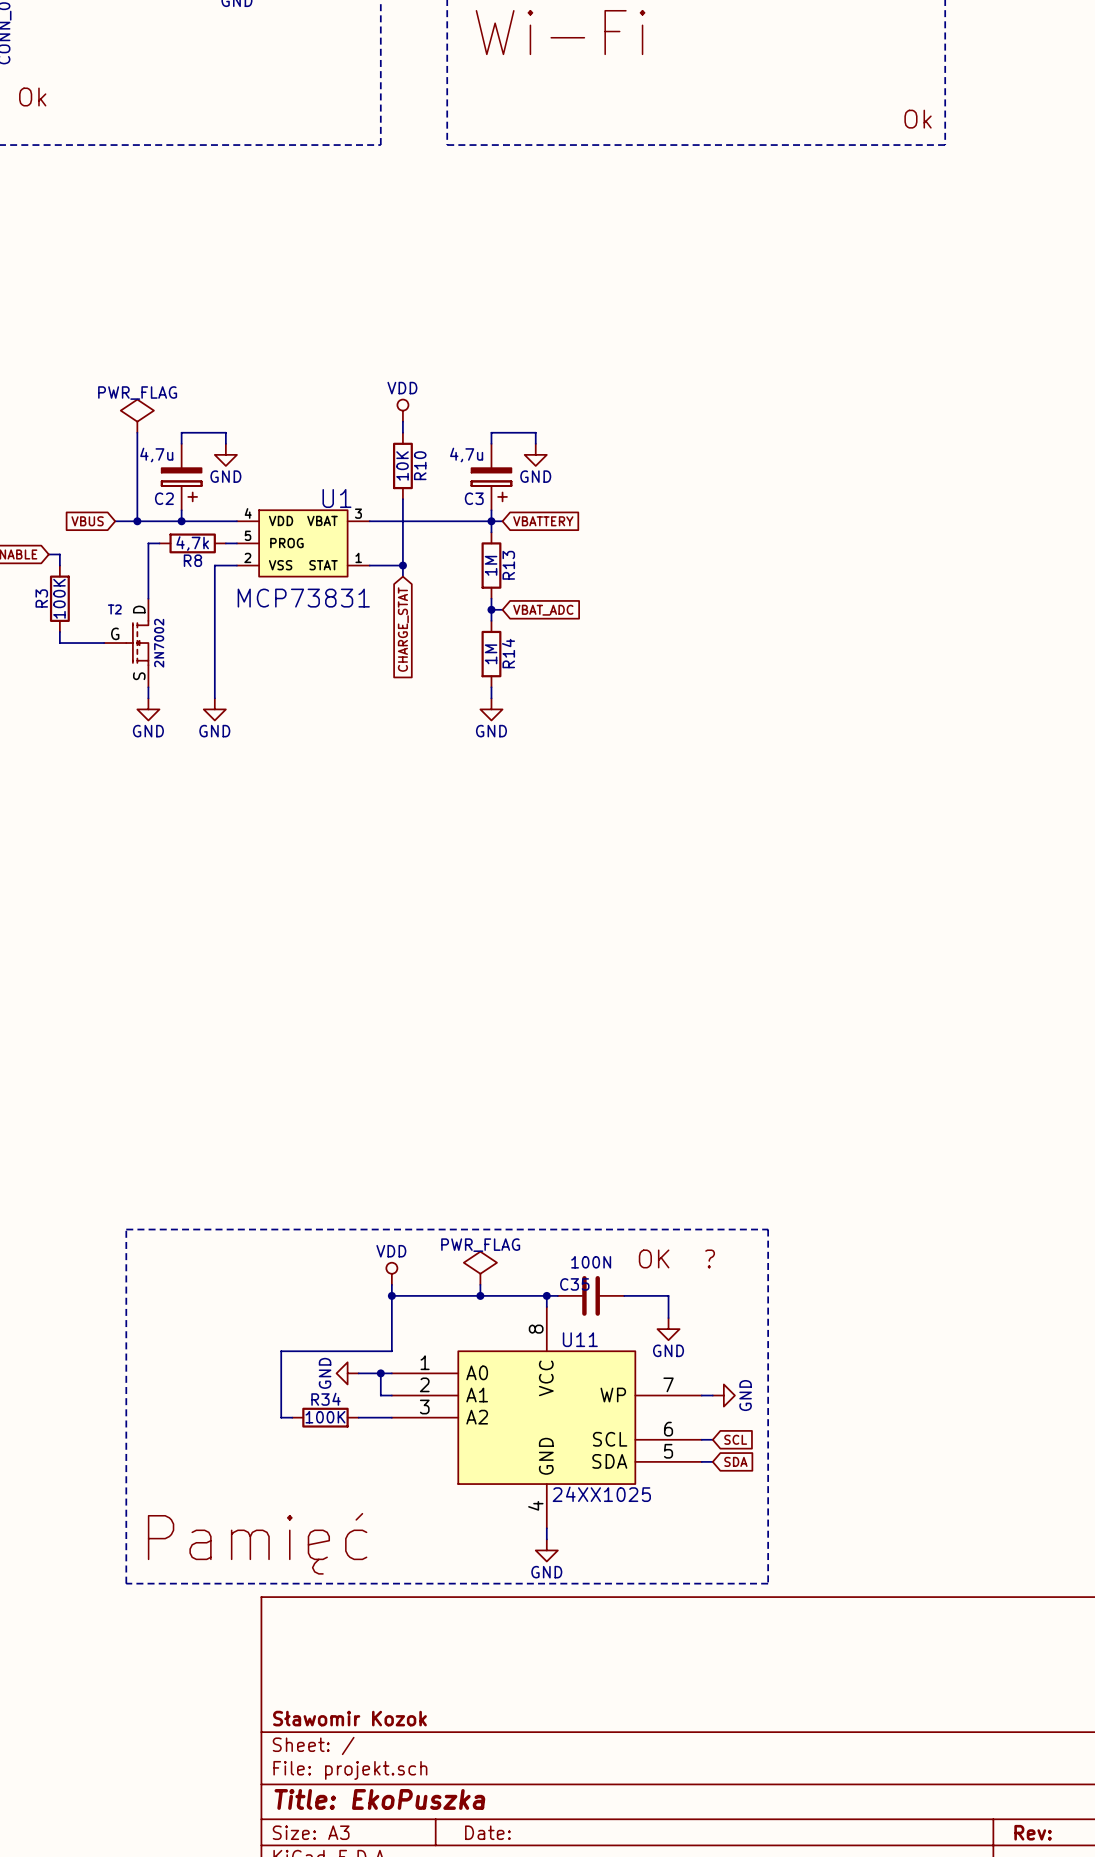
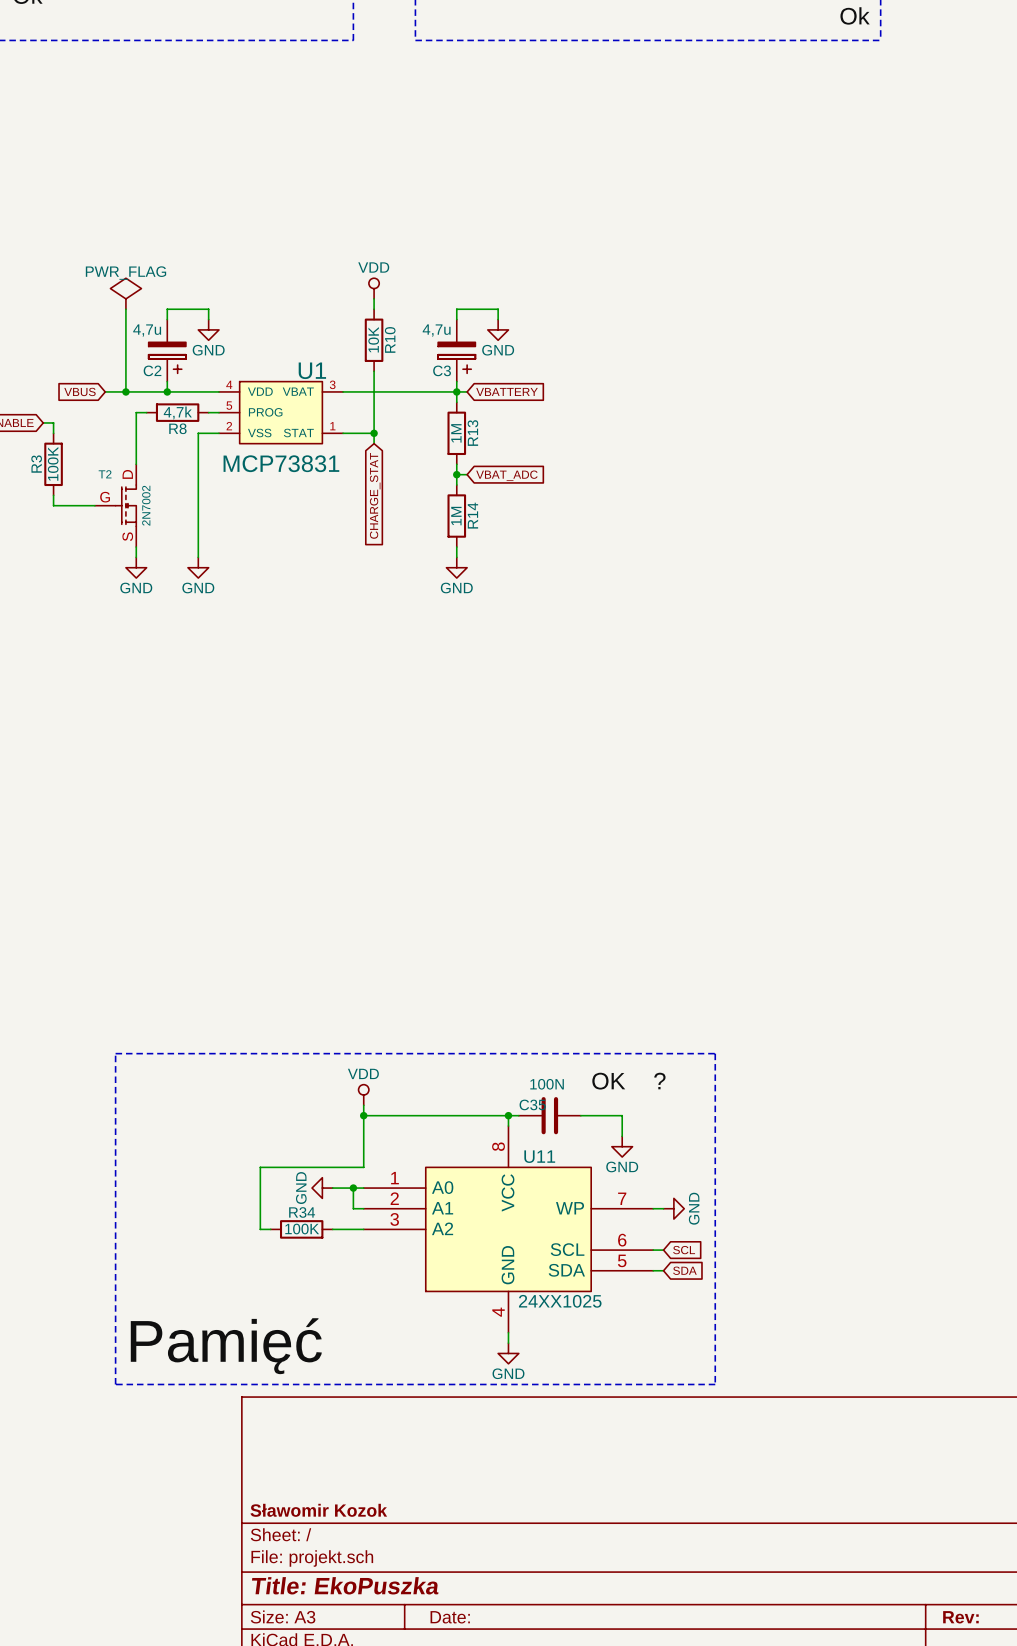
power symbol: PWR_FLAG (480, 1268) -> none
wire: (480, 1284) (480, 1295) -> none
junction: (480, 1295) -> none

